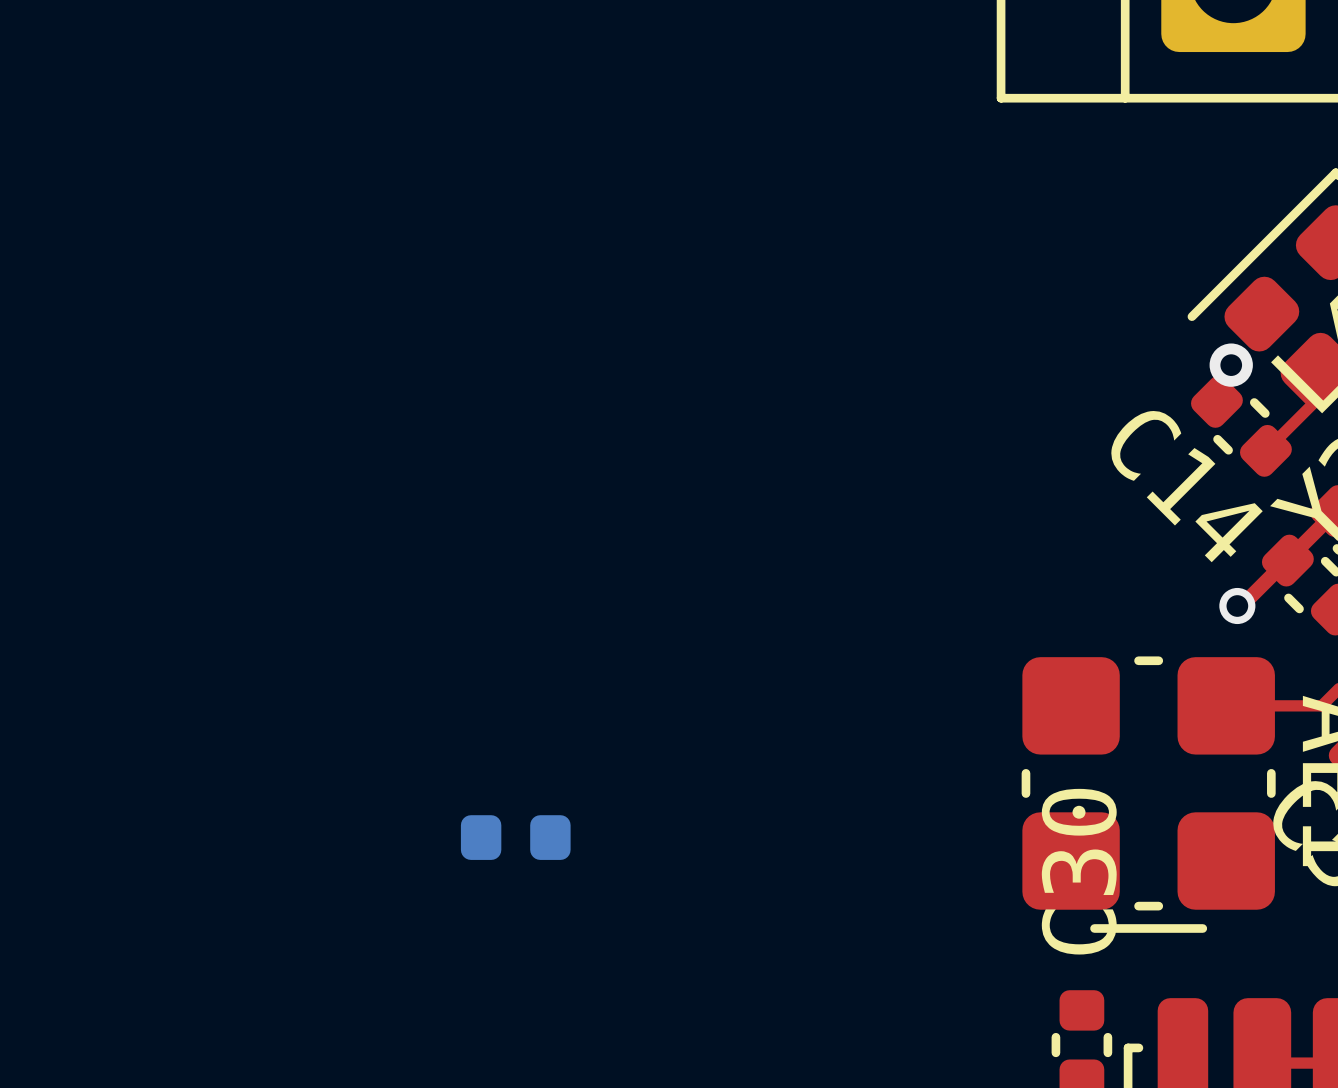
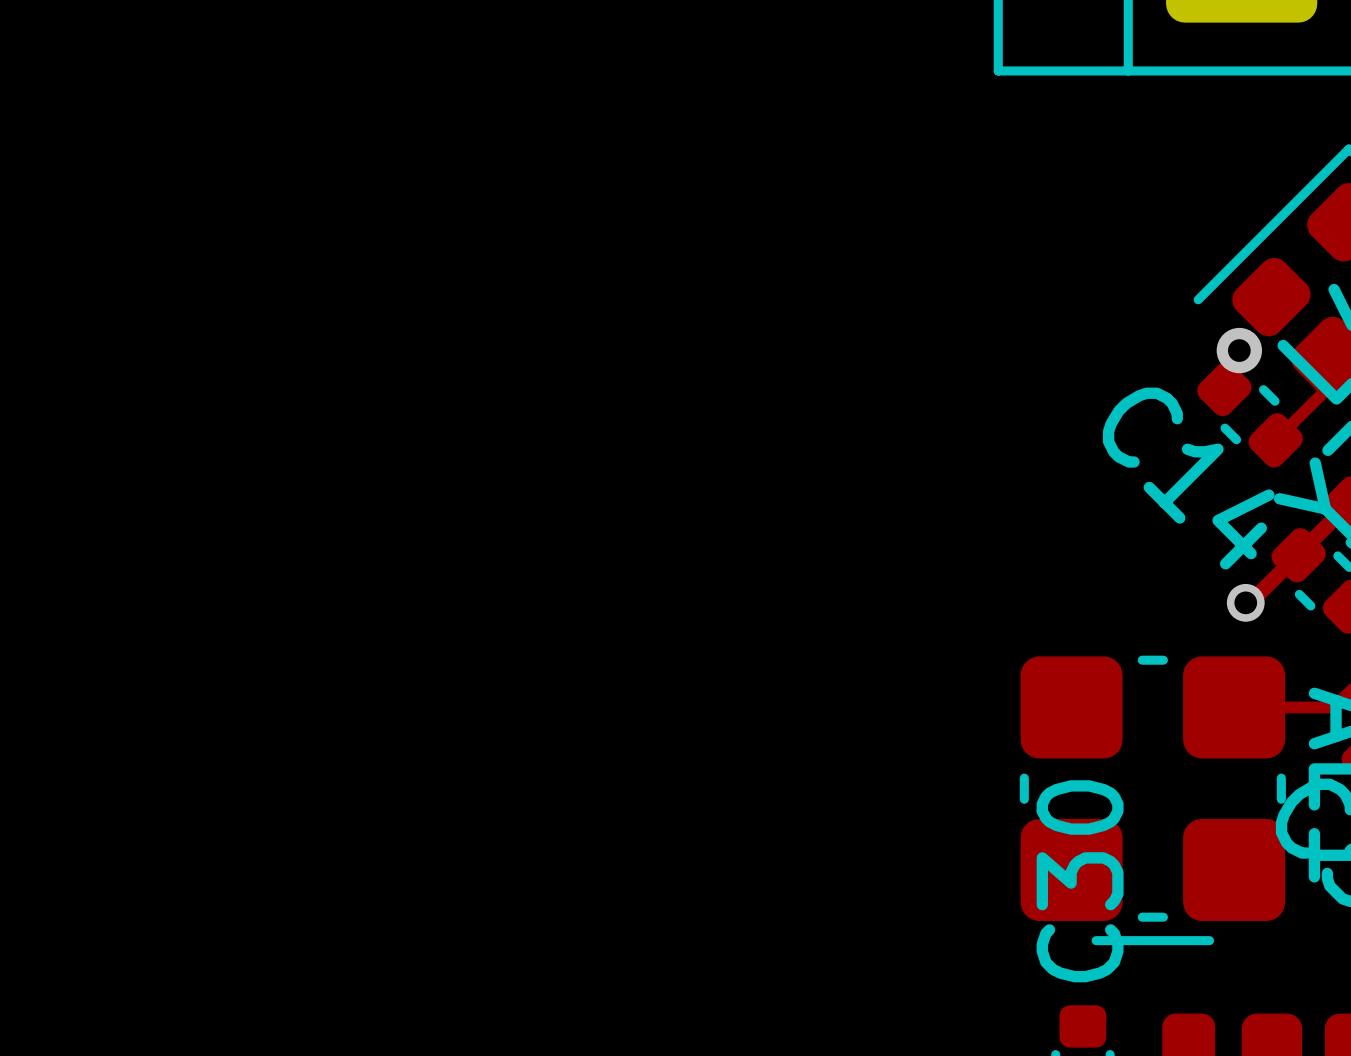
part: (515, 837) -> none

